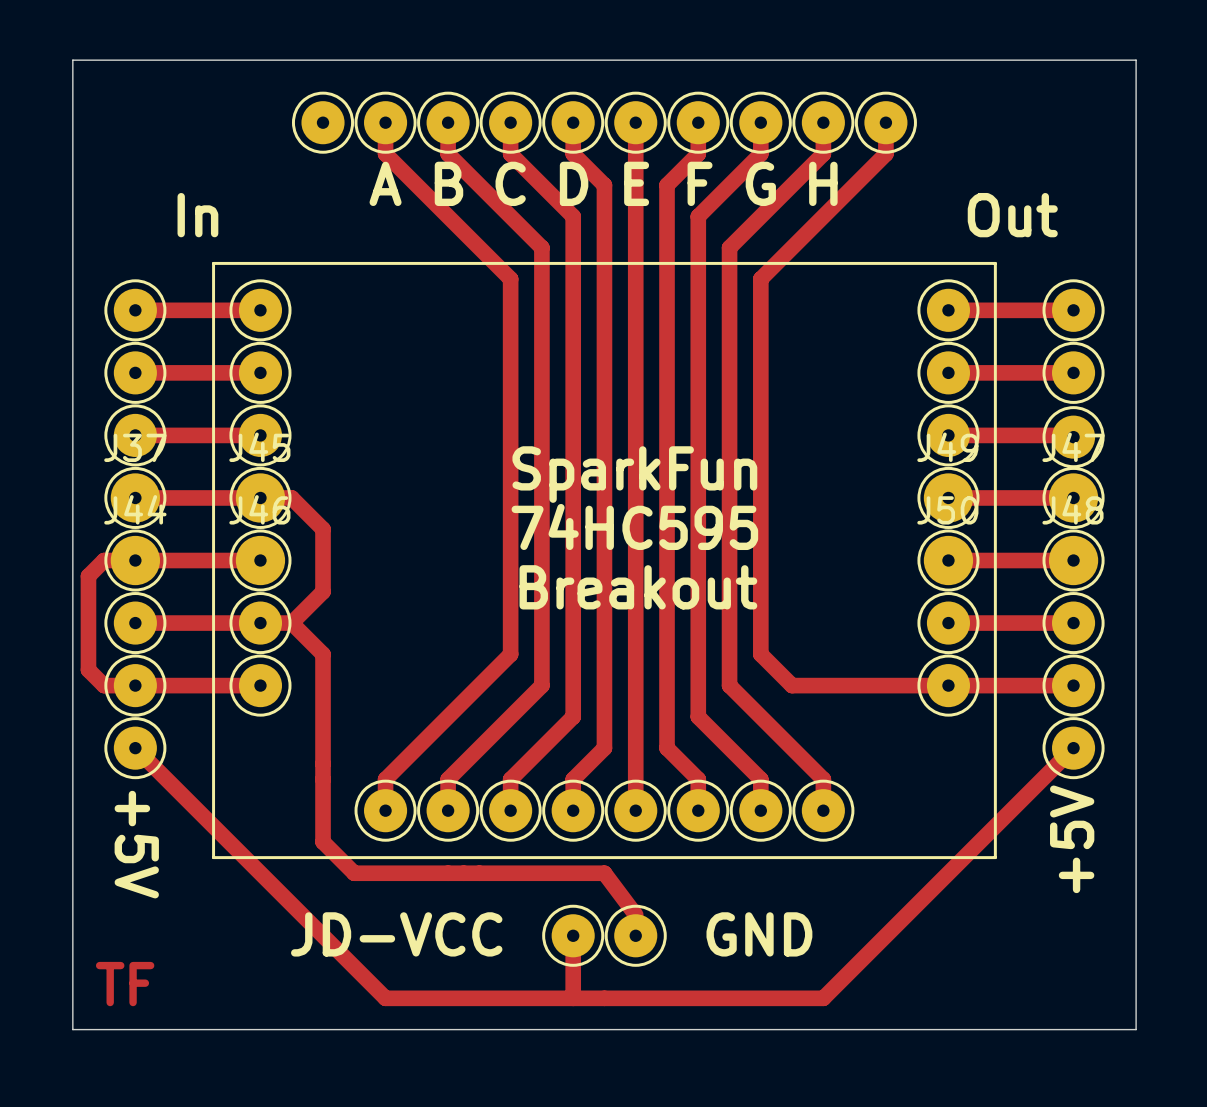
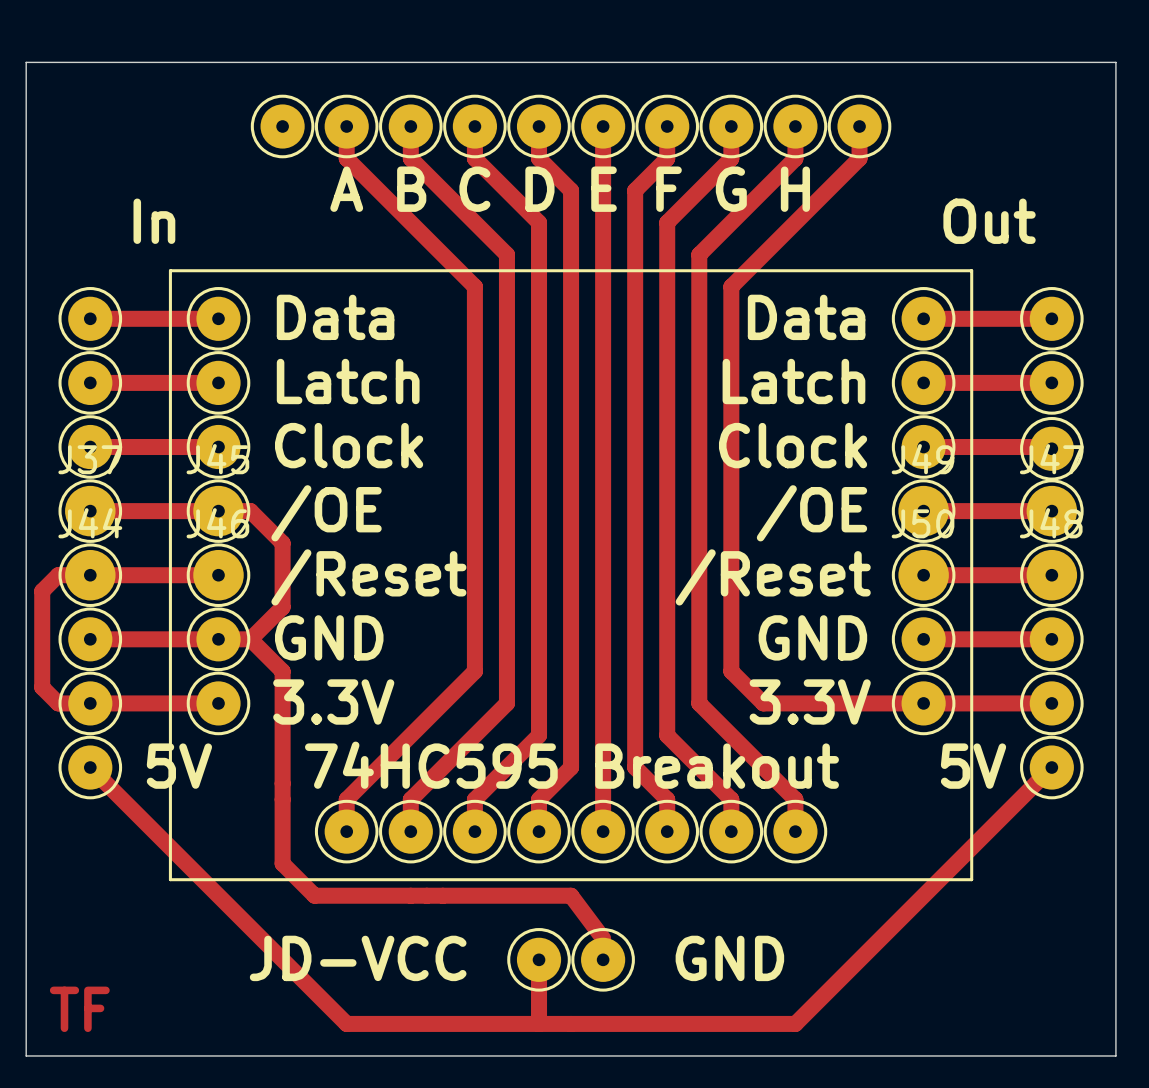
text: none -> Data (335, 317)
text: none -> Data (806, 317)
text: none -> Latch (348, 381)
text: none -> Latch (793, 381)
text: none -> Clock (349, 445)
text: none -> Clock (793, 445)
text: SparkFun (634, 474) -> none
text: none -> /OE (326, 513)
text: none -> /OE (811, 513)
text: 74HC595 (634, 526) -> none
text: none -> /Reset (368, 577)
text: none -> /Reset (773, 577)
text: Breakout (638, 587) -> none
text: none -> GND (329, 637)
text: none -> GND (812, 637)
text: none -> 3.3V (333, 702)
text: none -> 3.3V (810, 702)
text: none -> 74HC595 Breakout (571, 765)
text: none -> 5V (179, 766)
text: +5V (1072, 839) -> 5V (973, 766)
text: +5V (136, 844) -> none

